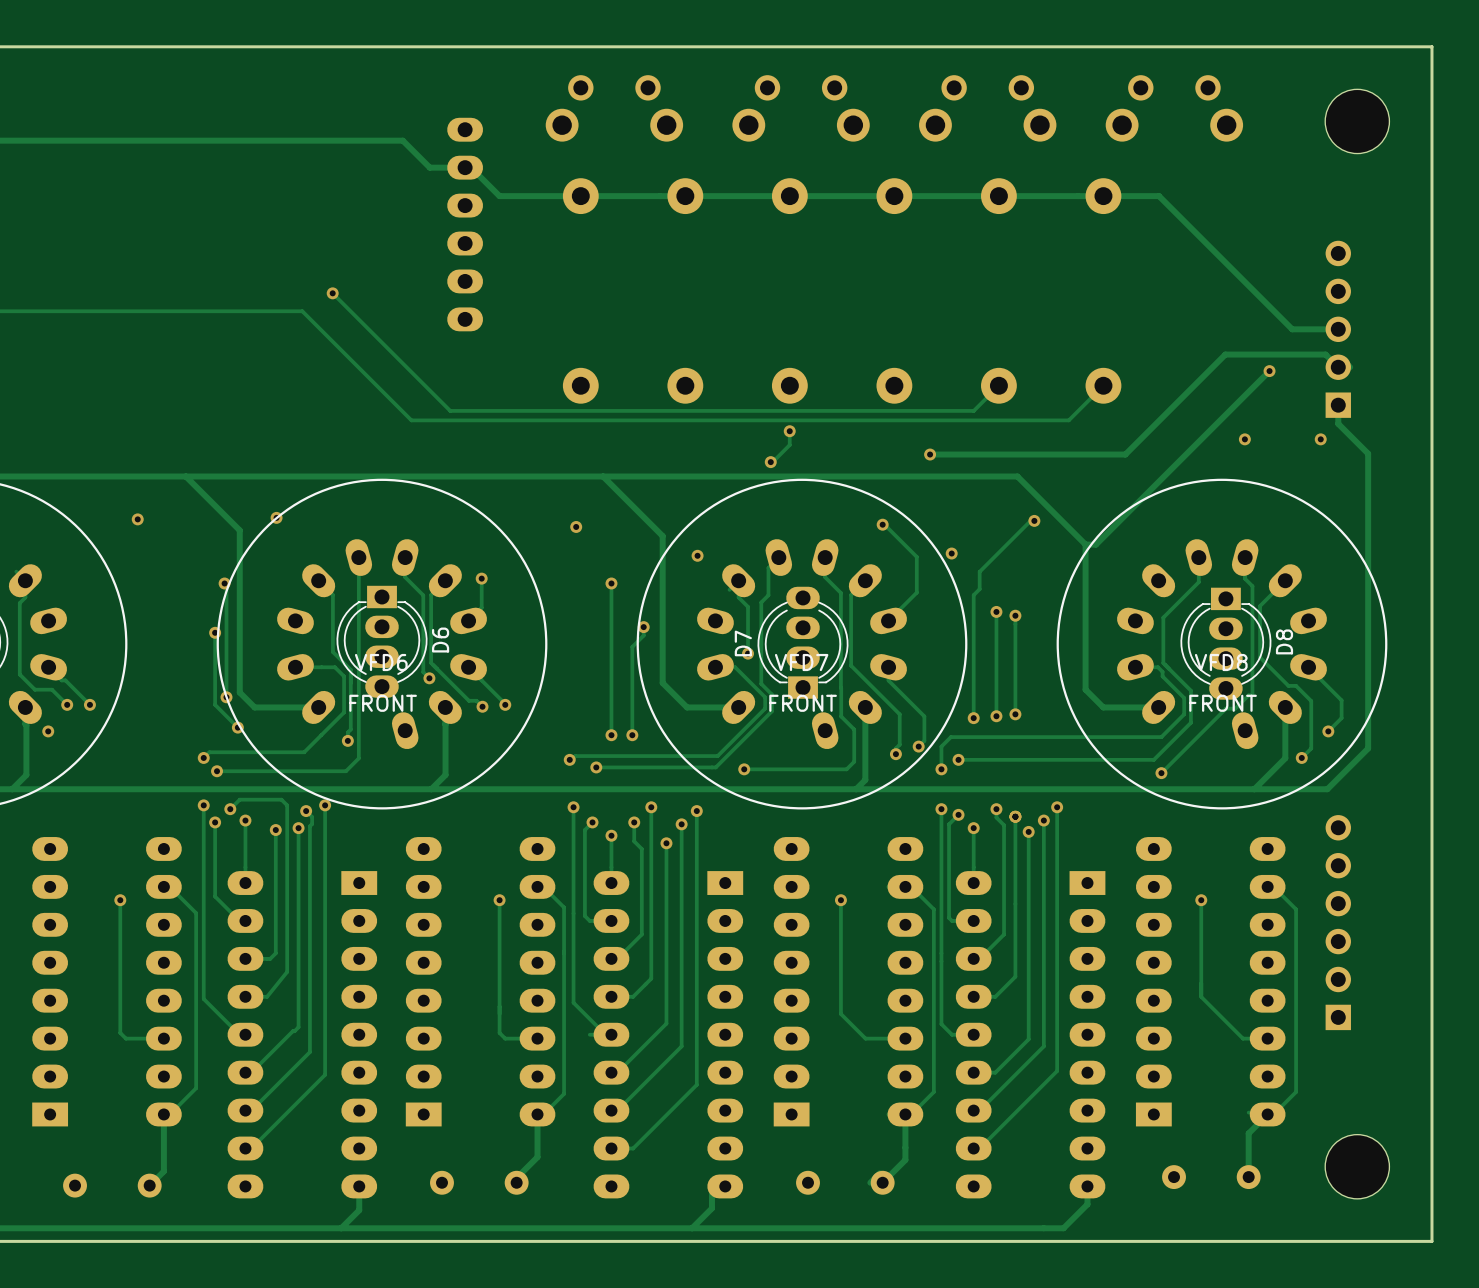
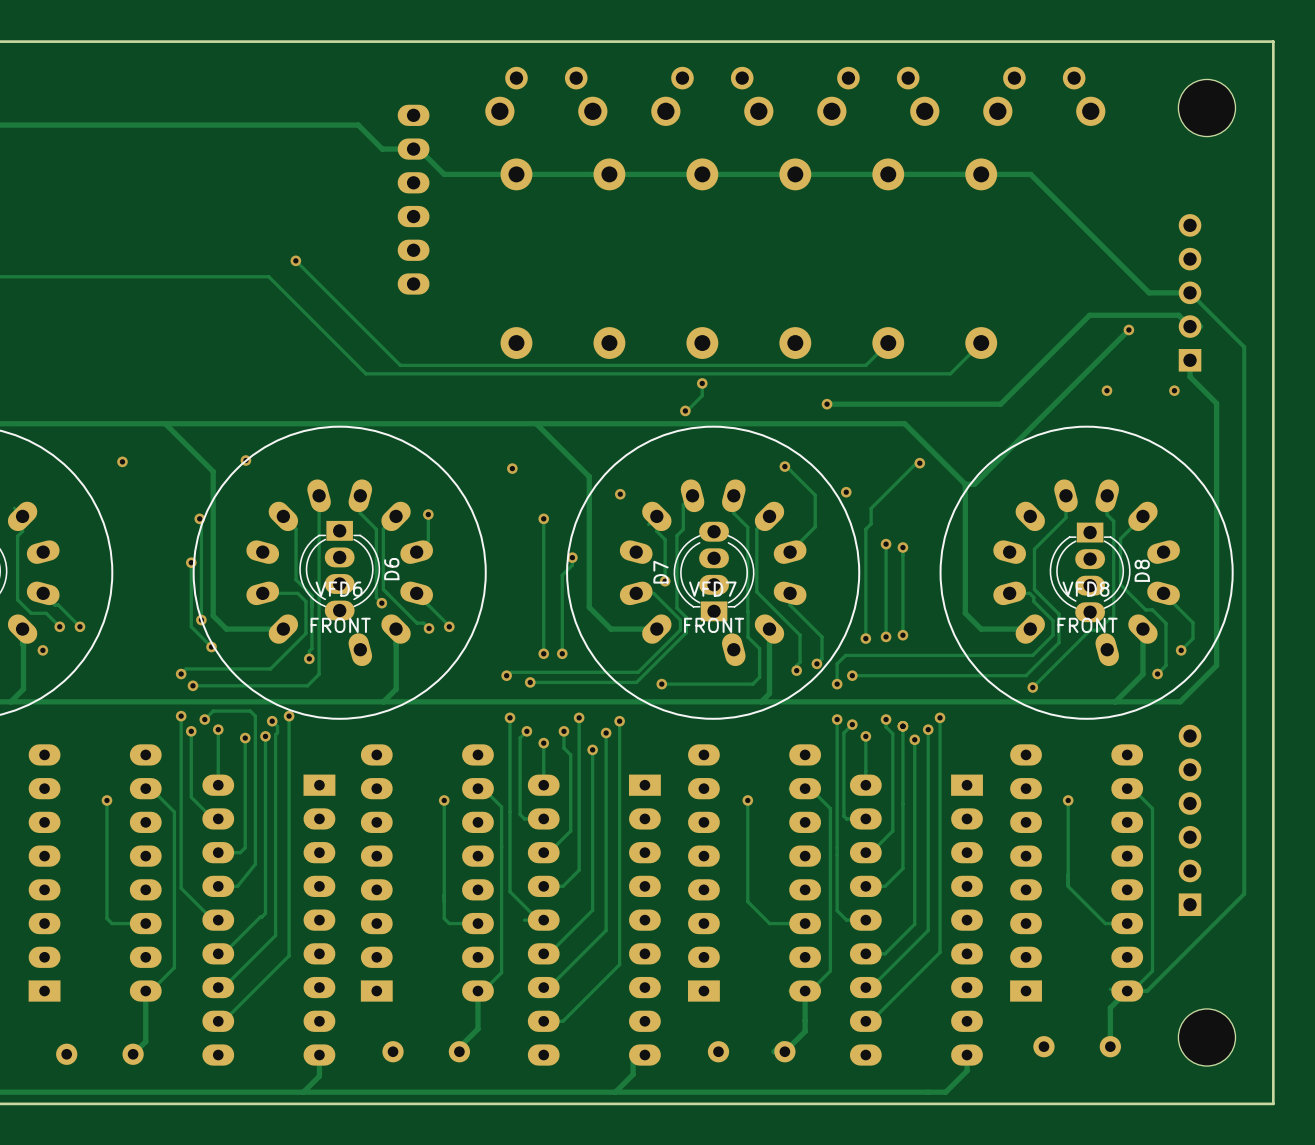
track: none -> (1190, 292) (1244, 347) (1244, 893) (1147, 991) (1127, 991)

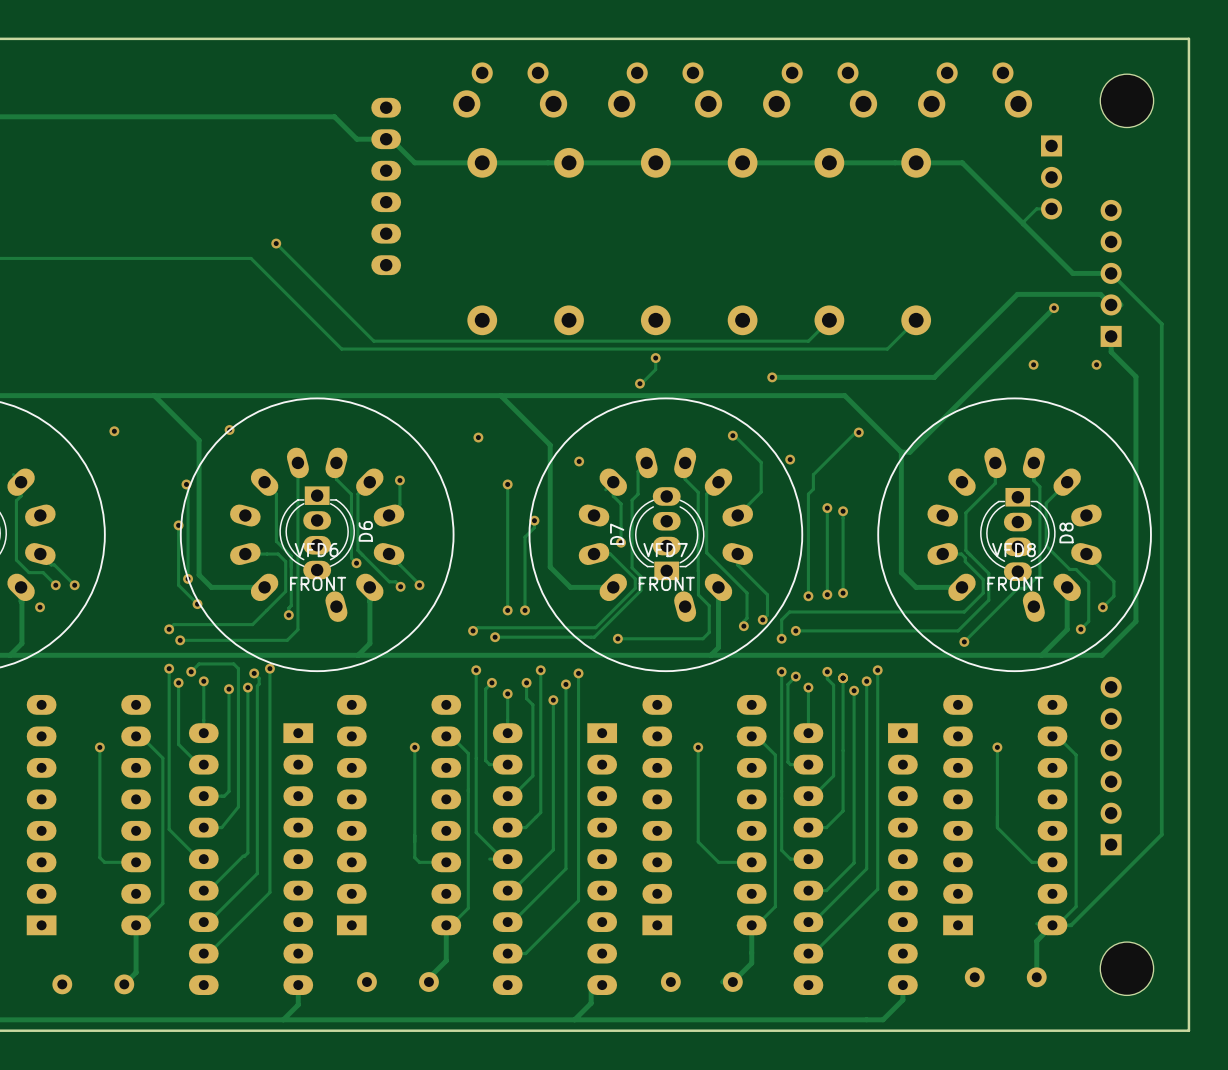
part: none -> (1051, 177)
track: none -> (1051, 208) (1036, 208) (1023, 224)

